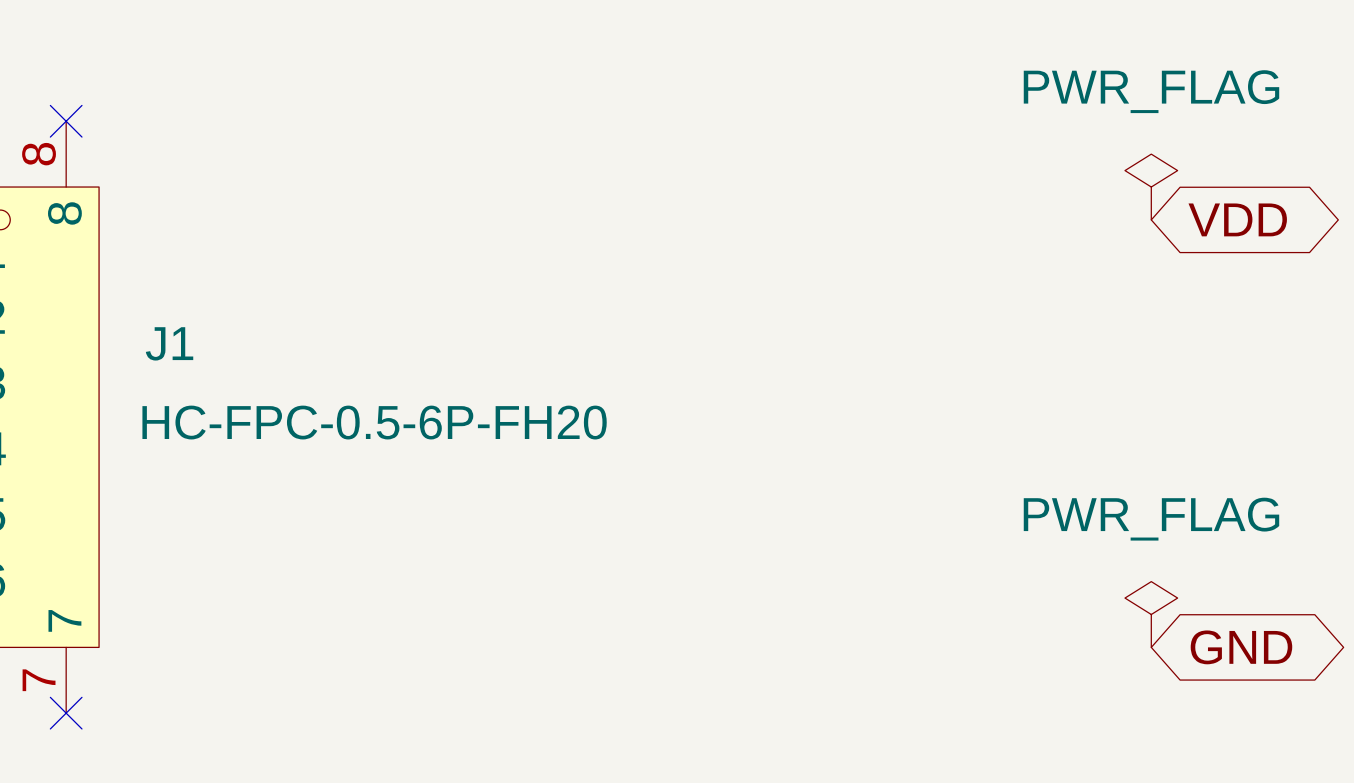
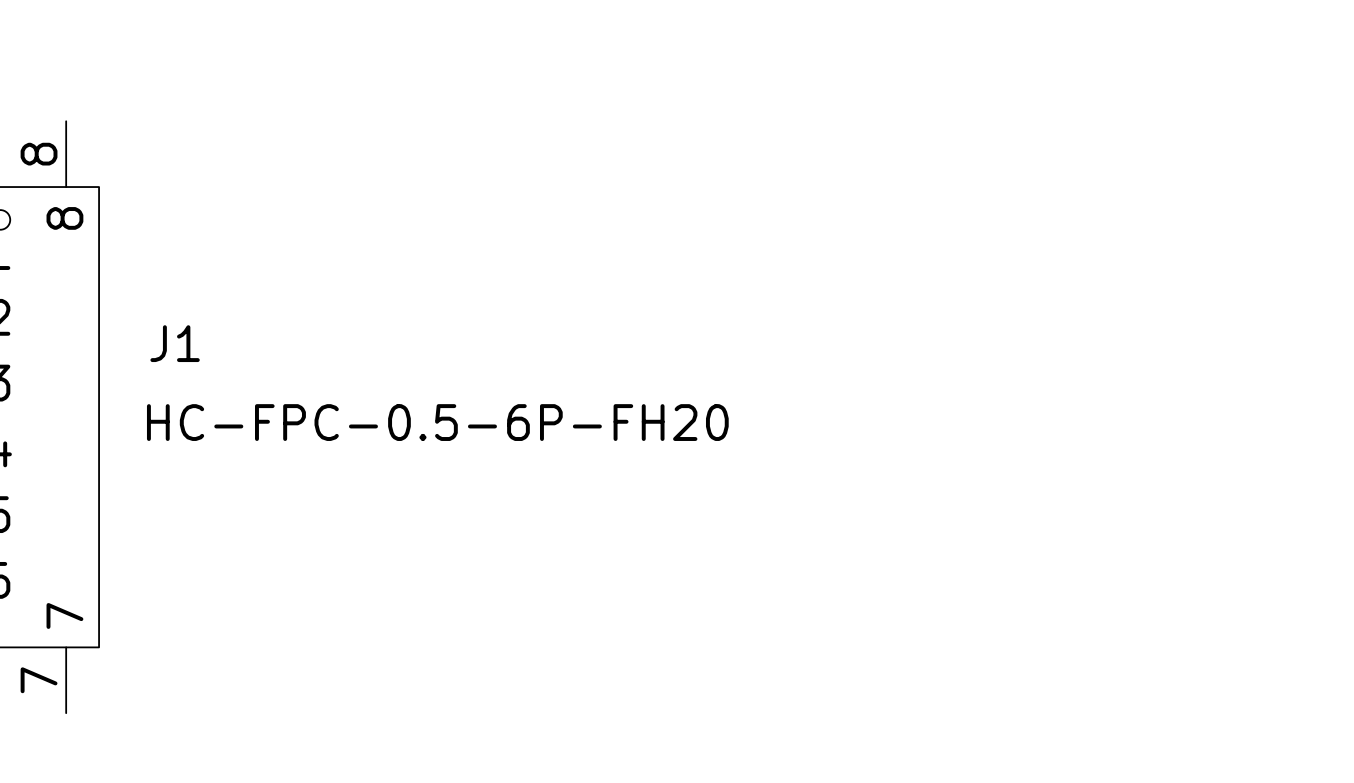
no-connect mark: (66, 121) -> none
power symbol: PWR_FLAG (1151, 187) -> none
global label: VDD (1237, 219) -> none
power symbol: PWR_FLAG (1151, 614) -> none
global label: GND (1241, 647) -> none
no-connect mark: (66, 713) -> none

